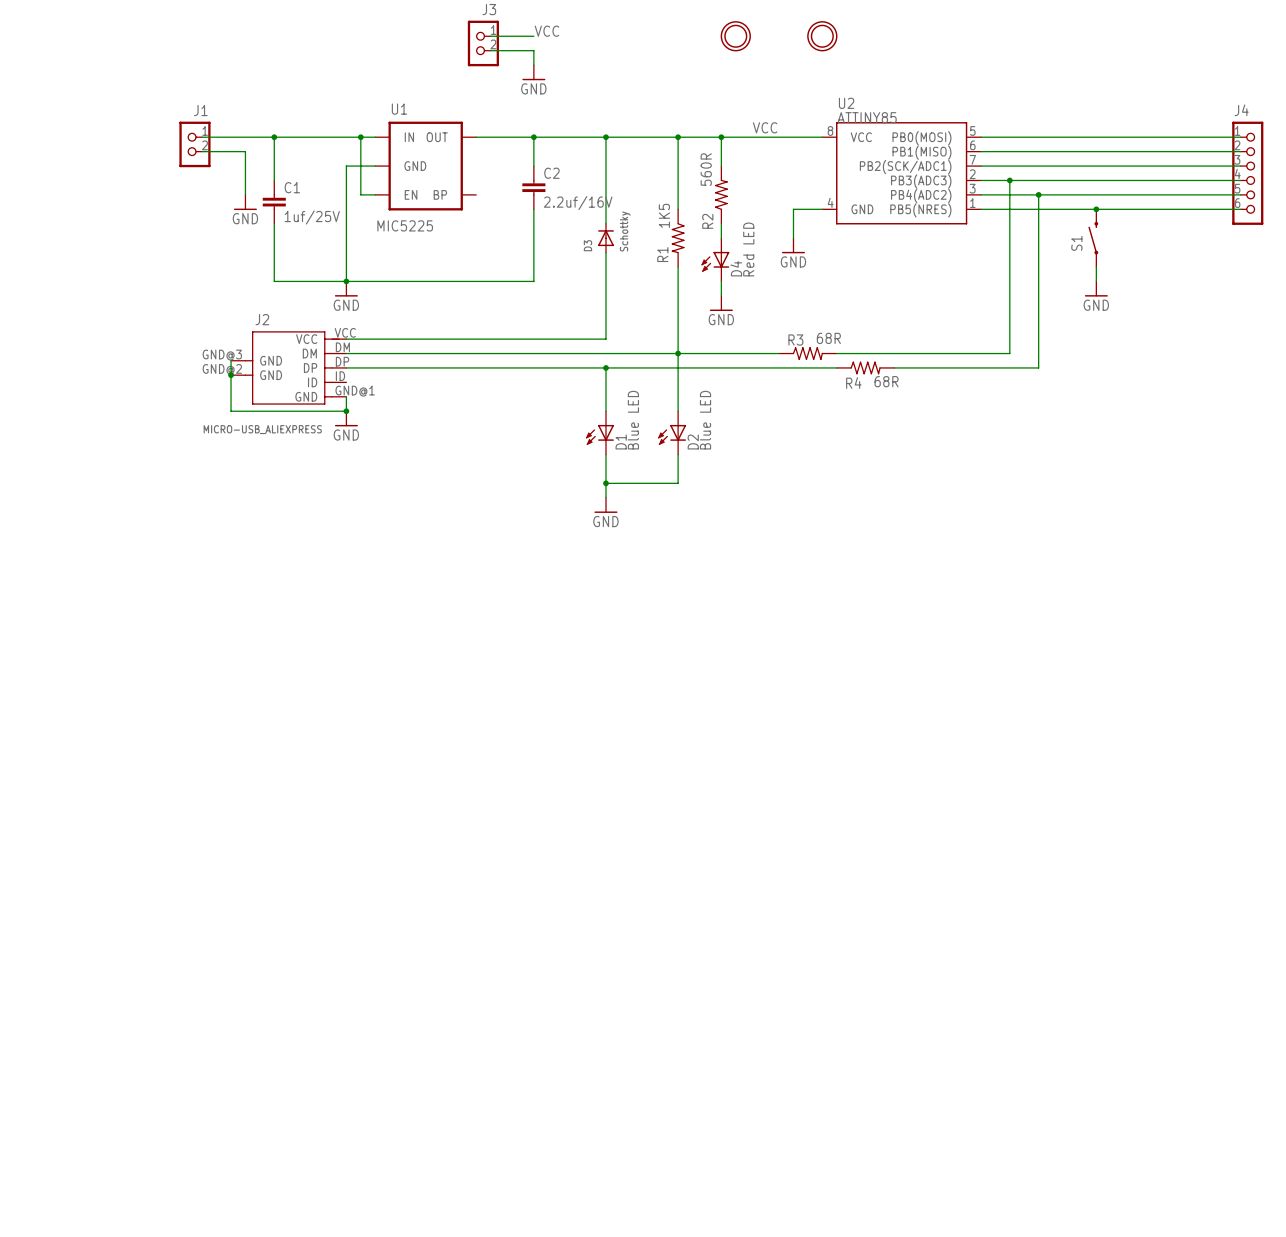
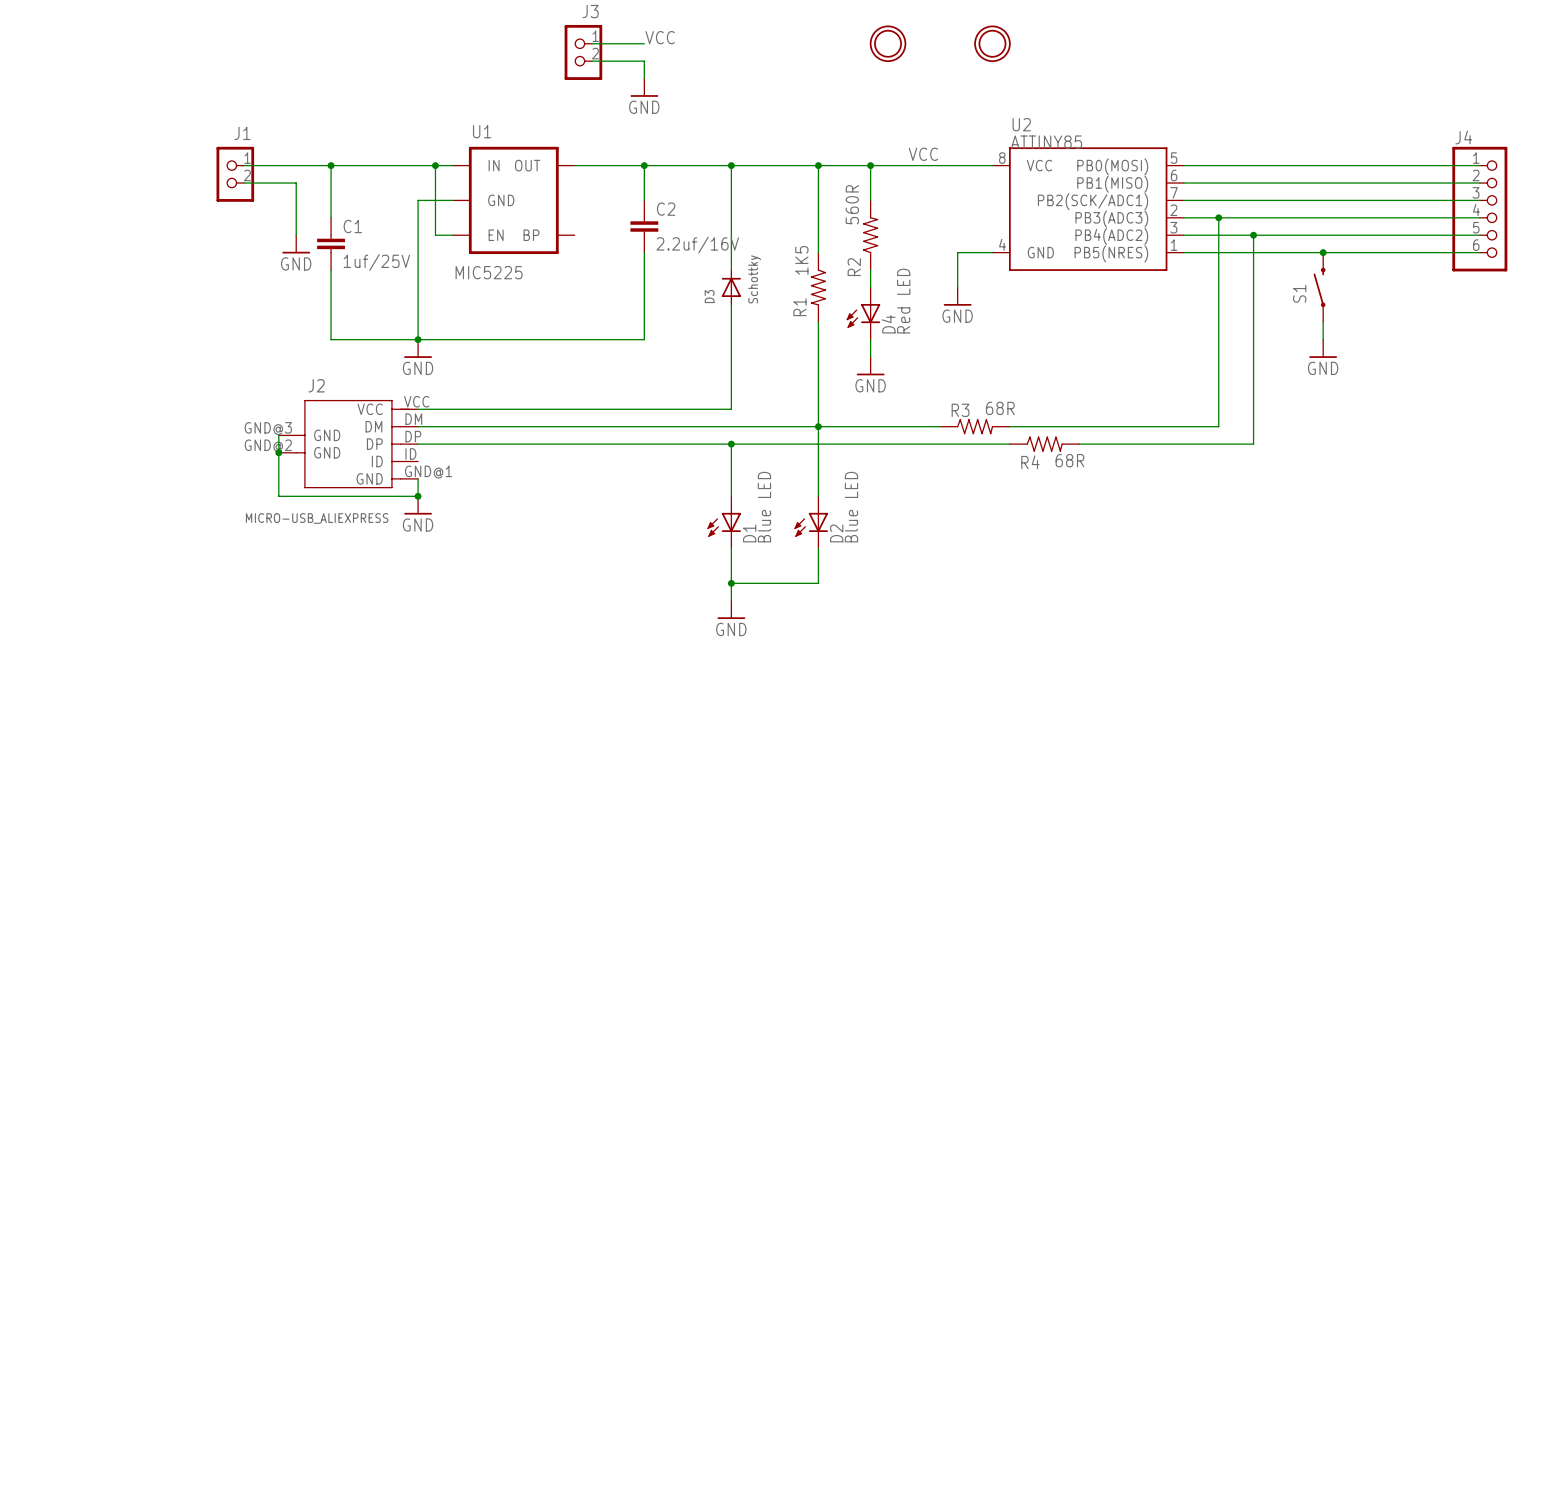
J4 symbol: [1232, 121, 1264, 225] -> [1452, 146, 1508, 272]

